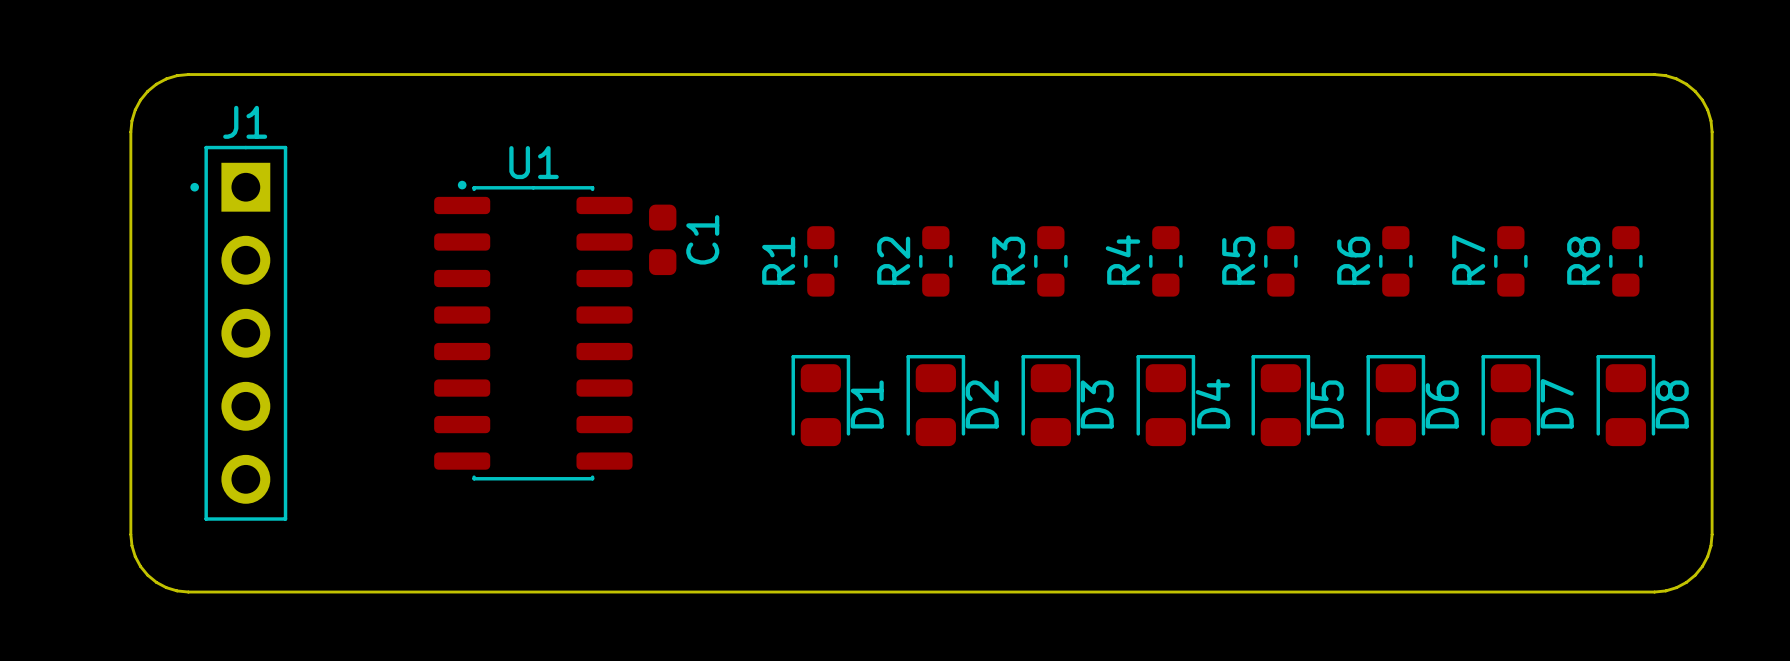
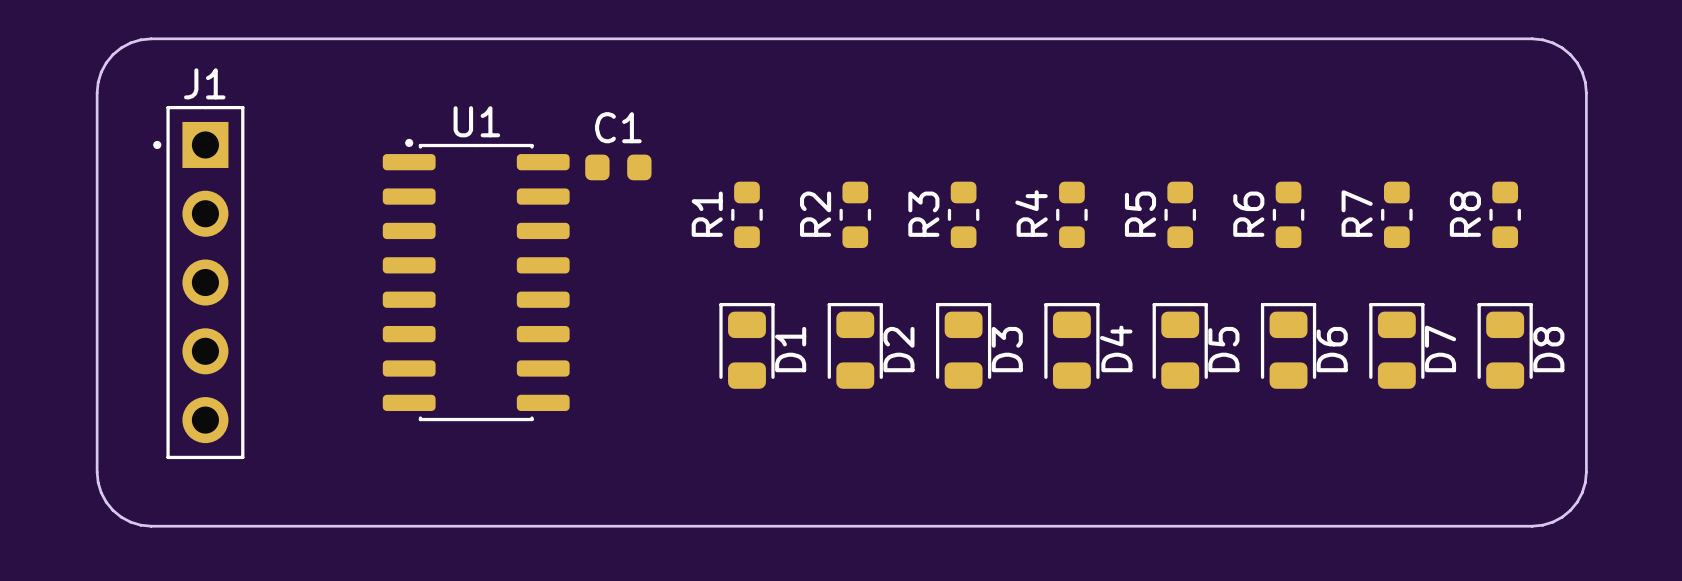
C1 rotation: 0° (662, 239) -> 90° clockwise (618, 167)
C1 name position: C1 (702, 239) -> C1 (618, 127)

